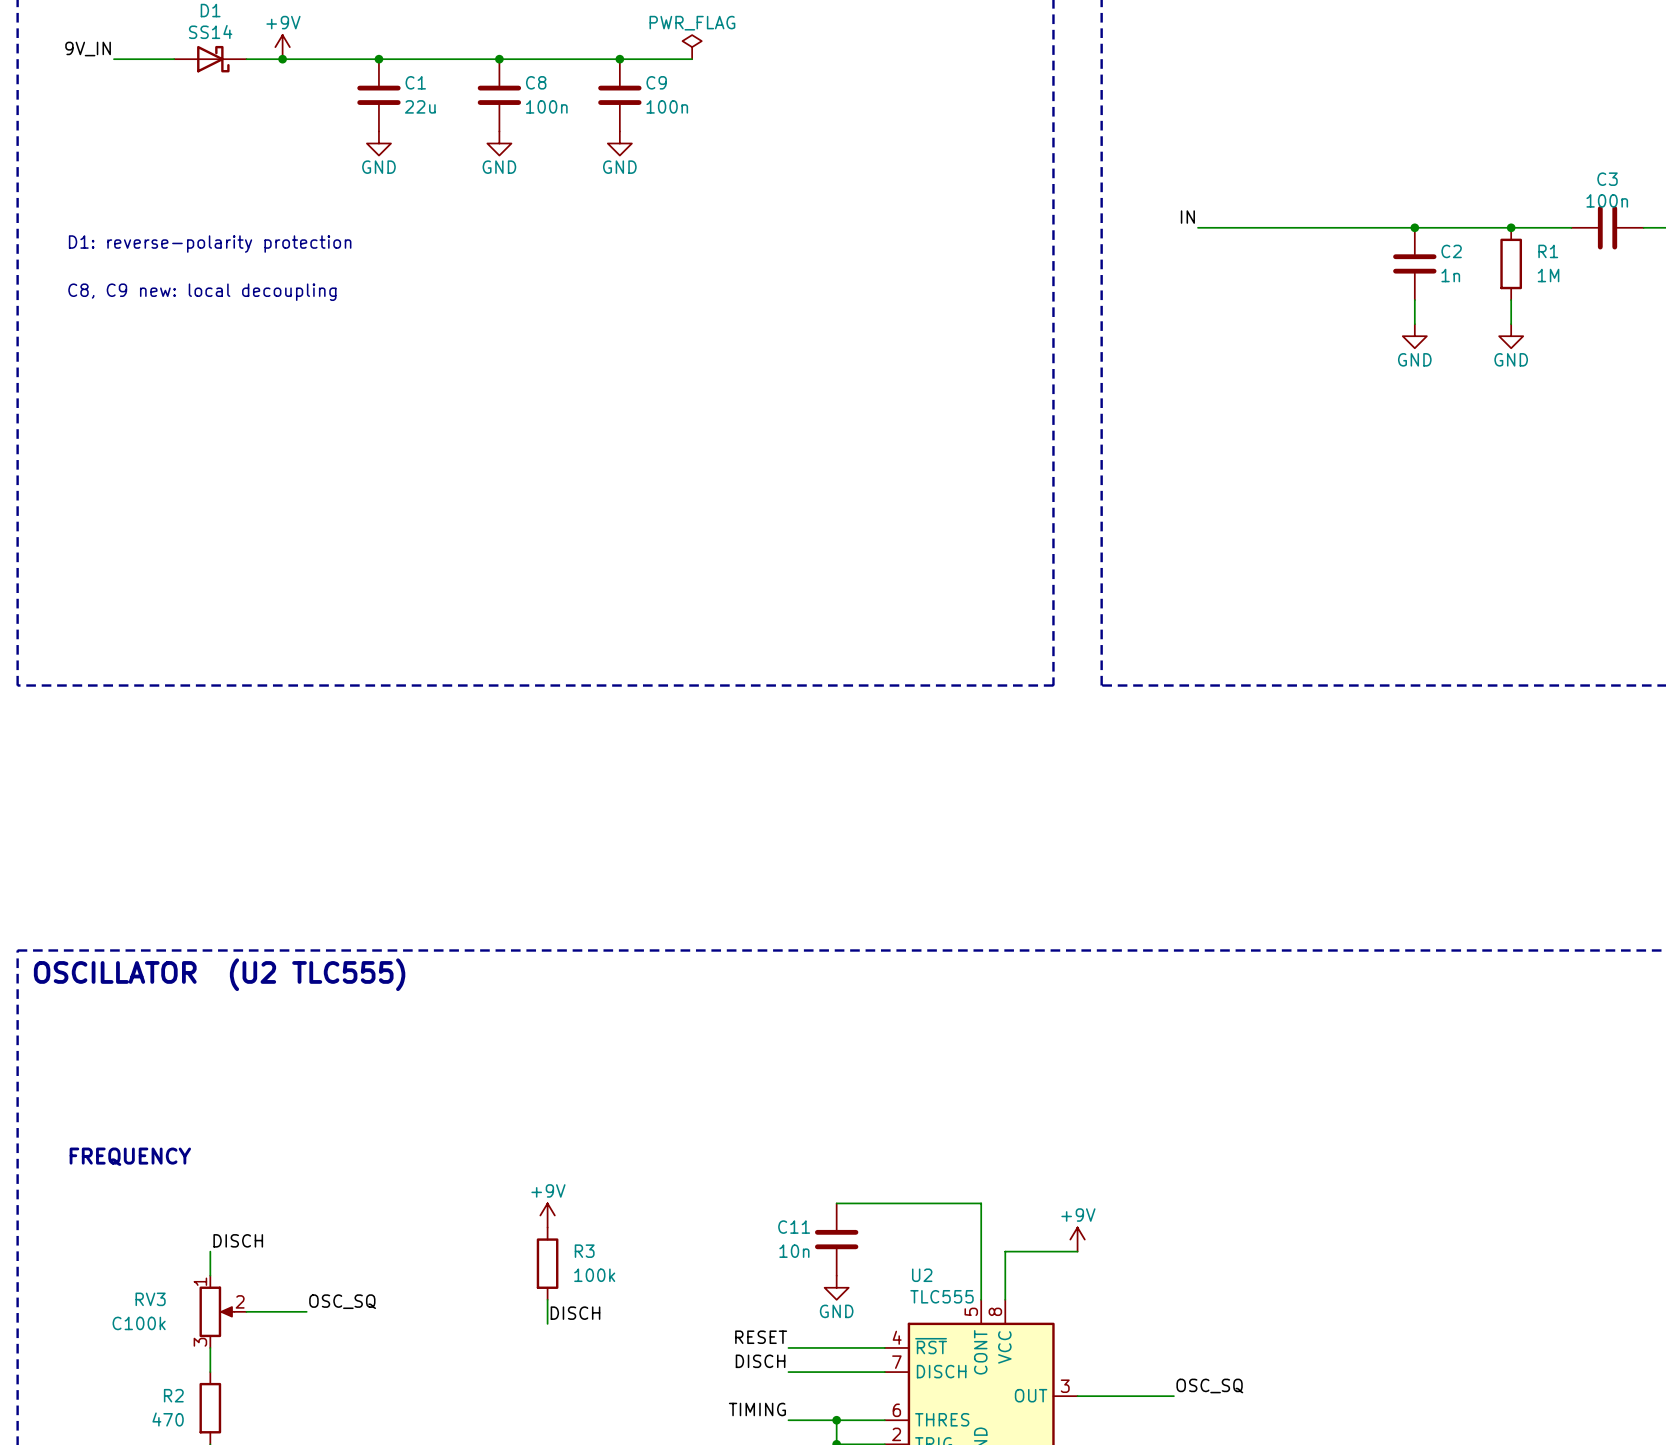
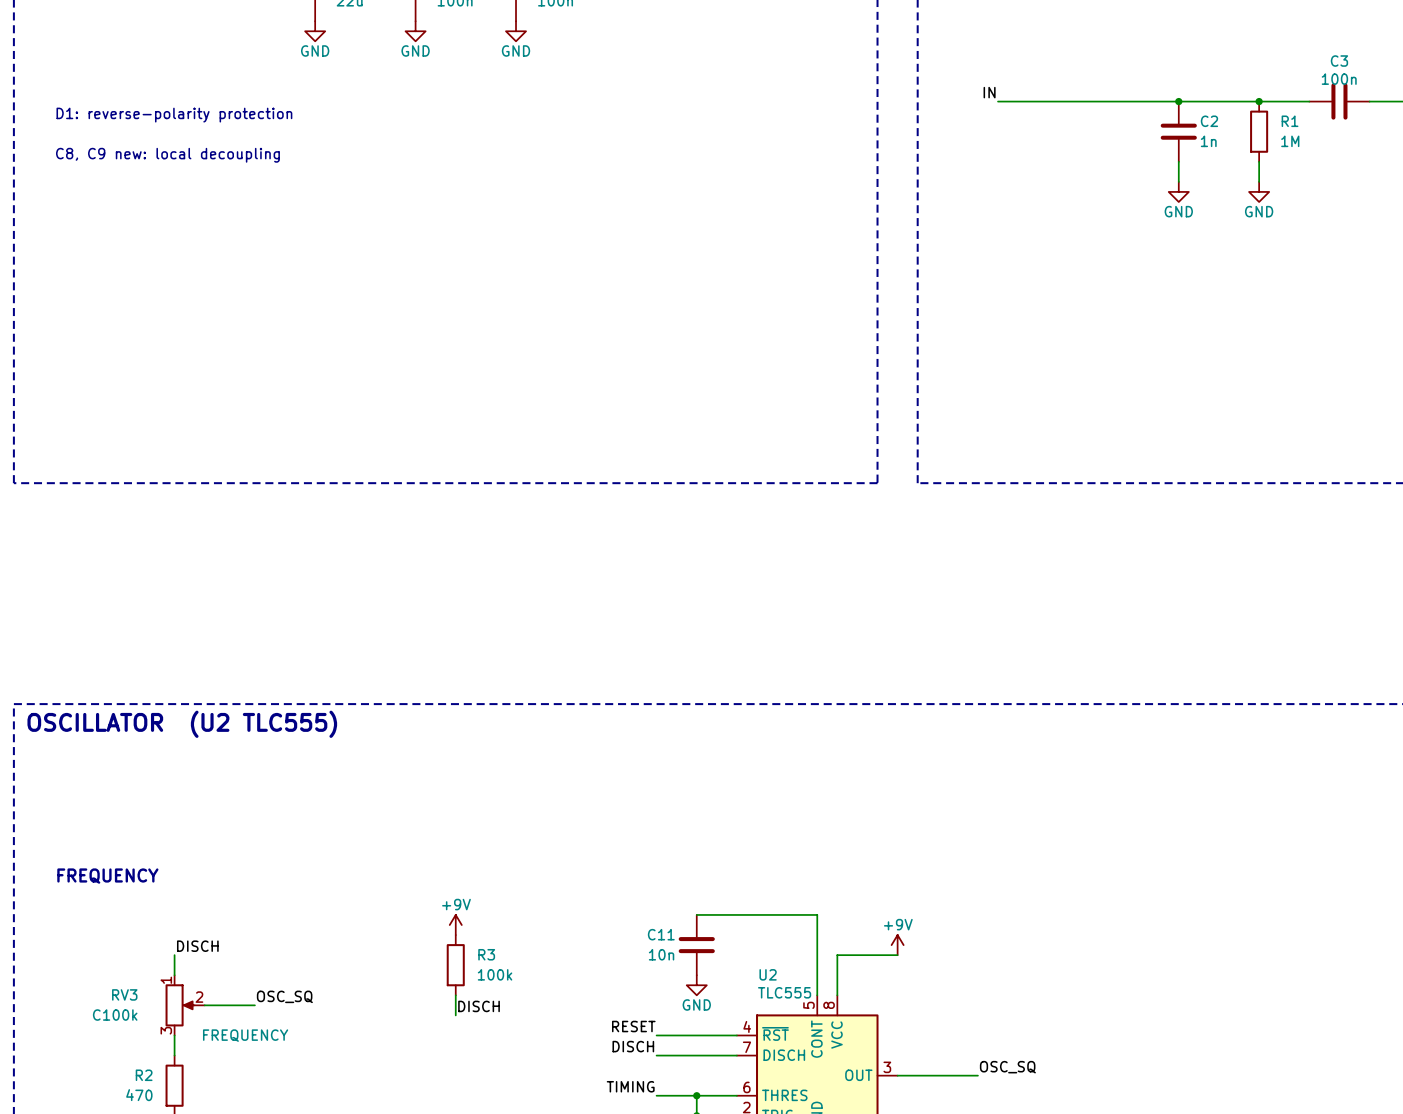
RV3 text: none -> FREQUENCY (245, 1035)

